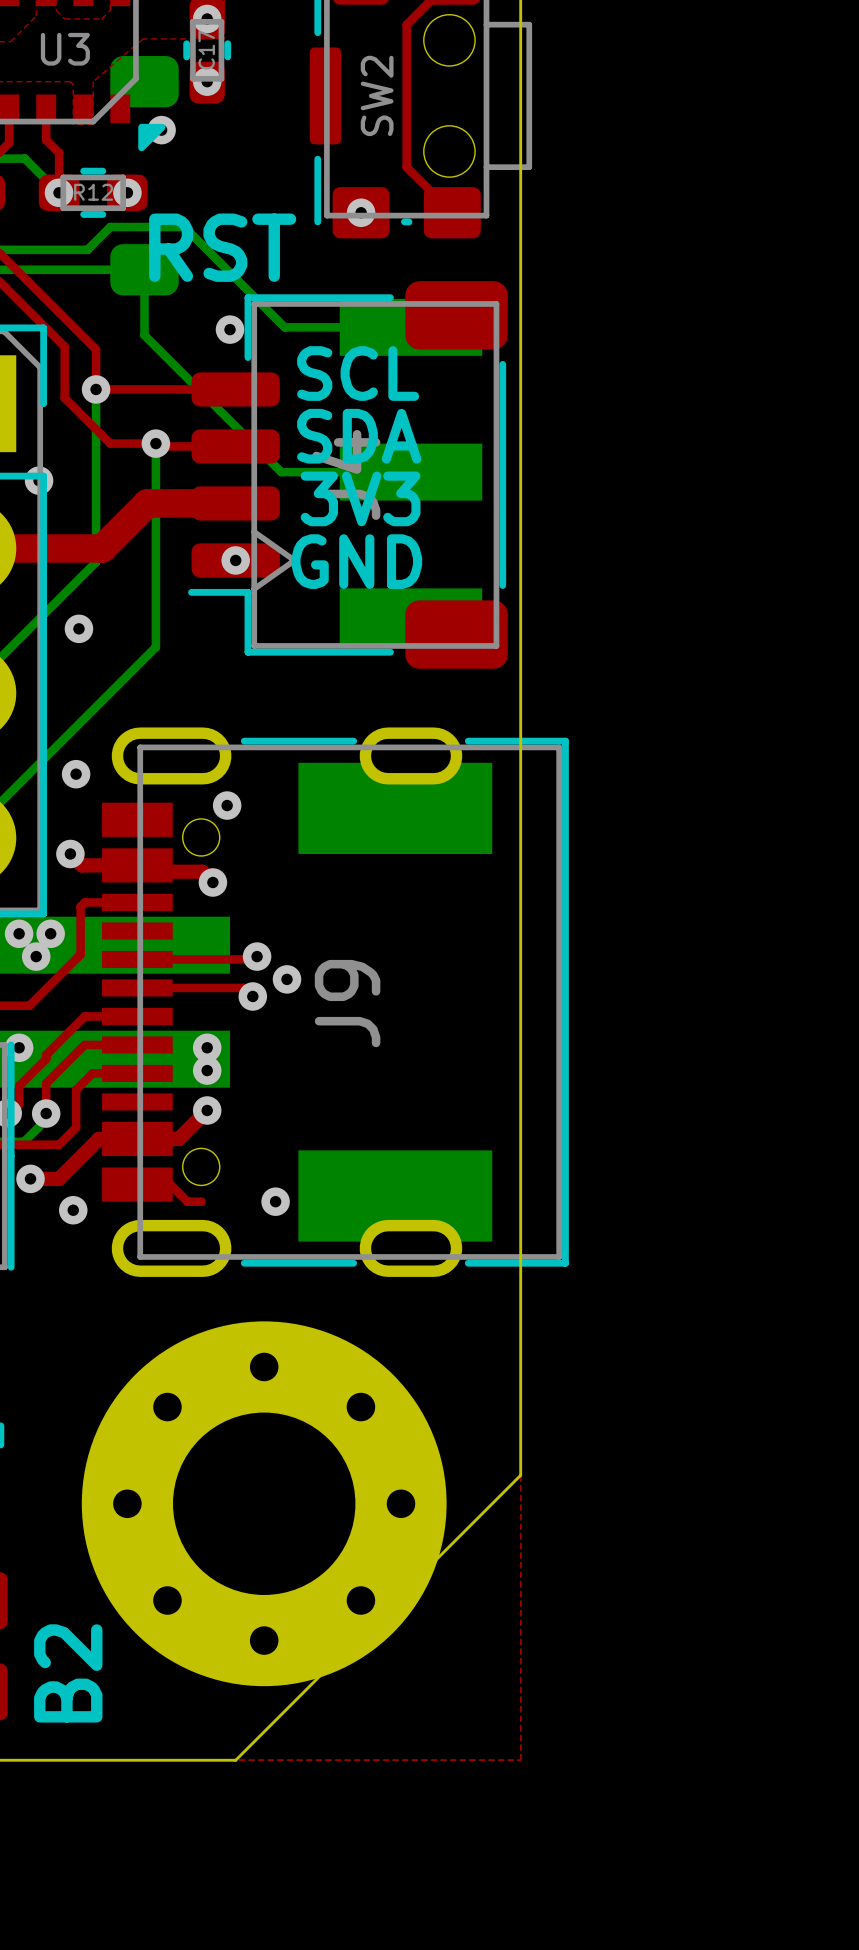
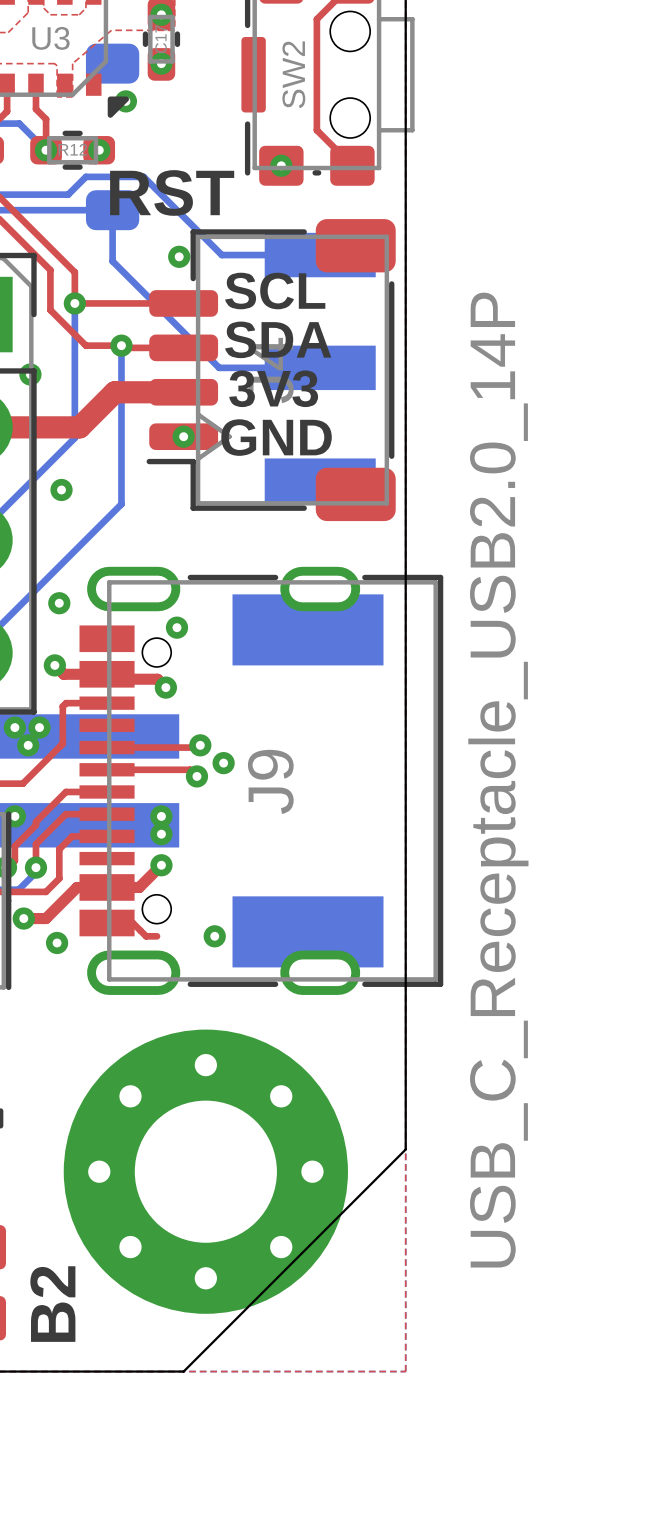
J9 value: none -> USB_C_Receptacle_USB2.0_14P (498, 780)

